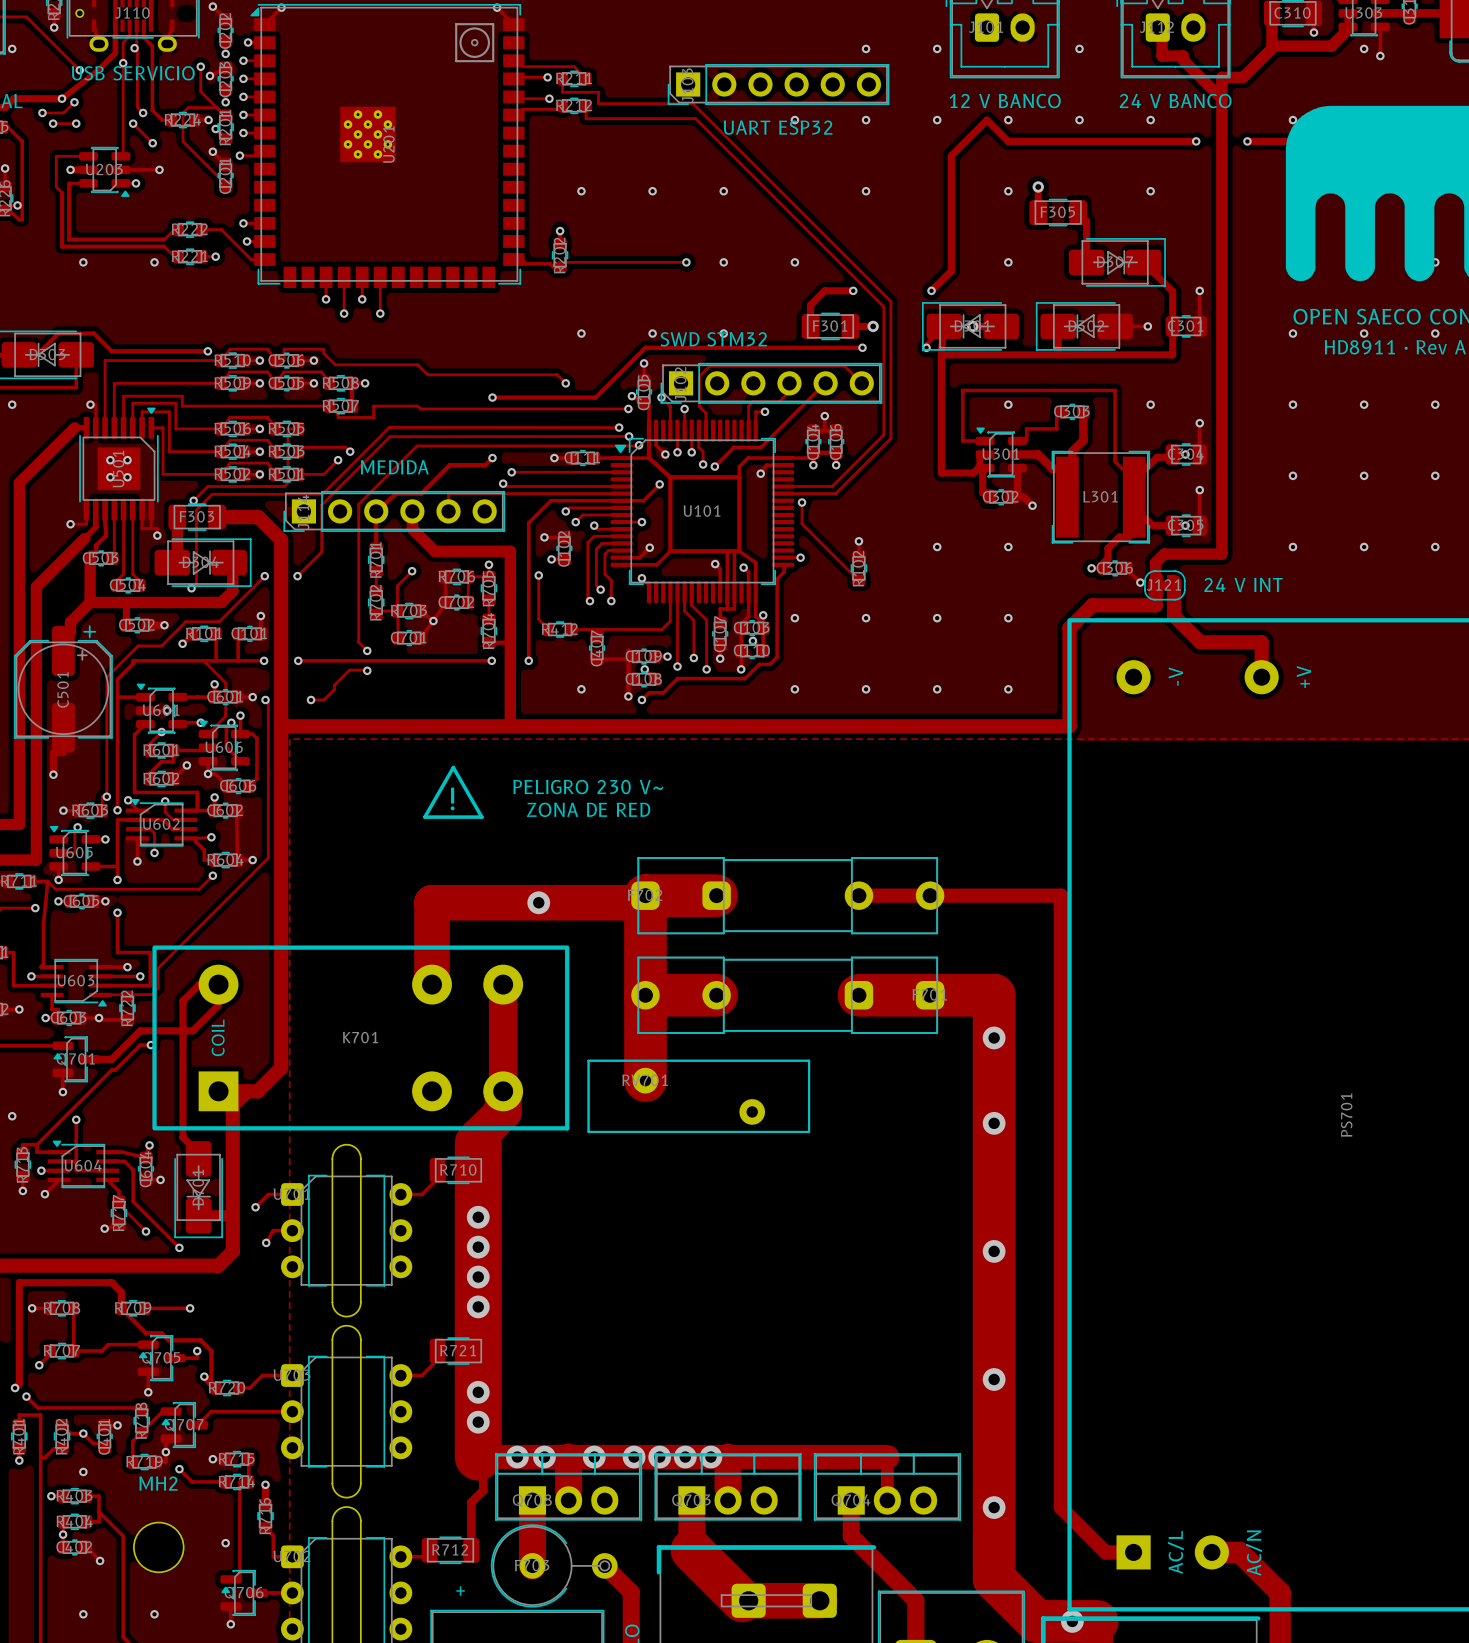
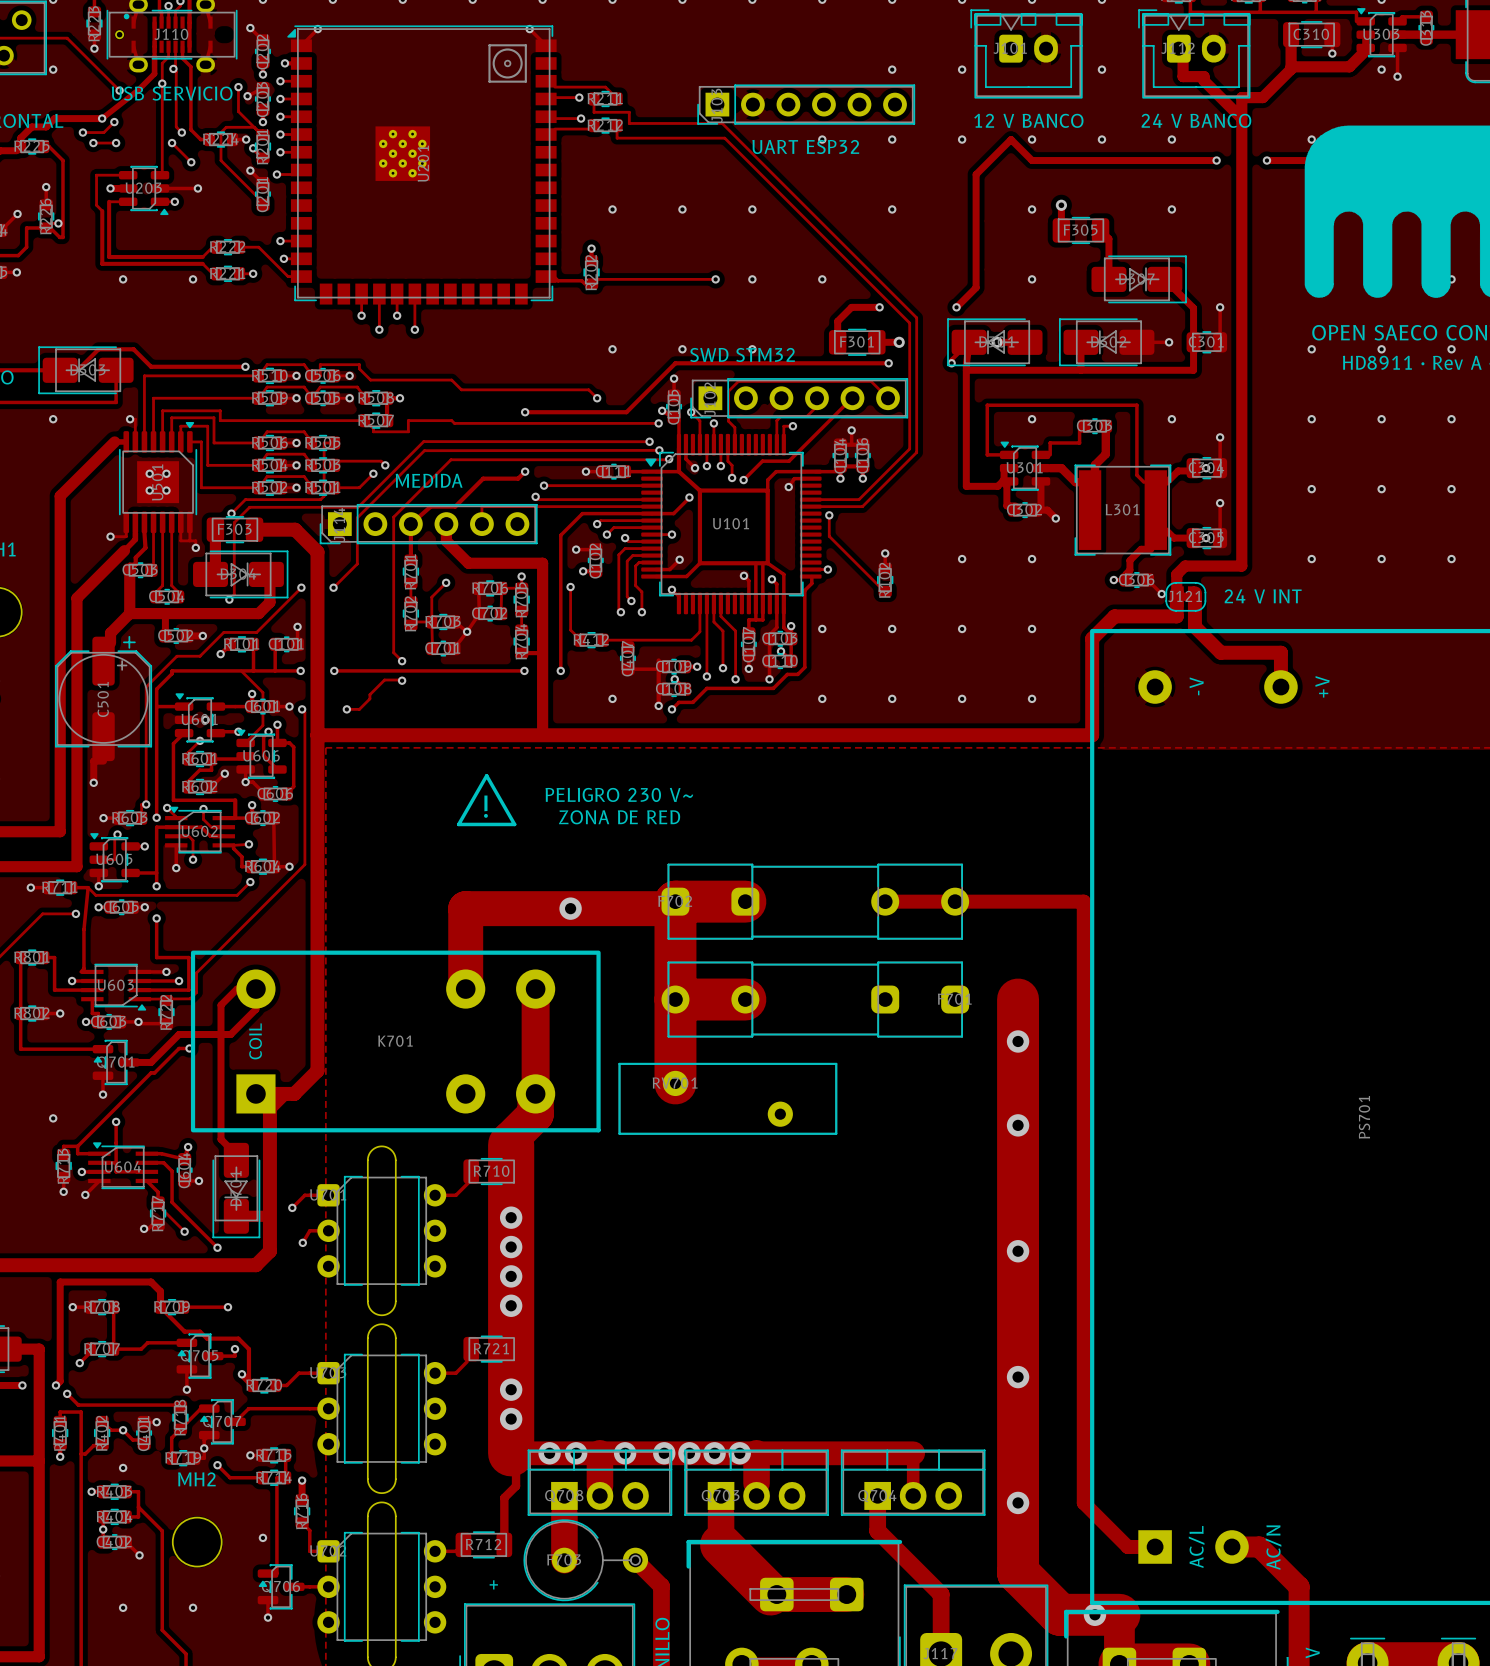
track: (858, 995) (994, 995) -> none

